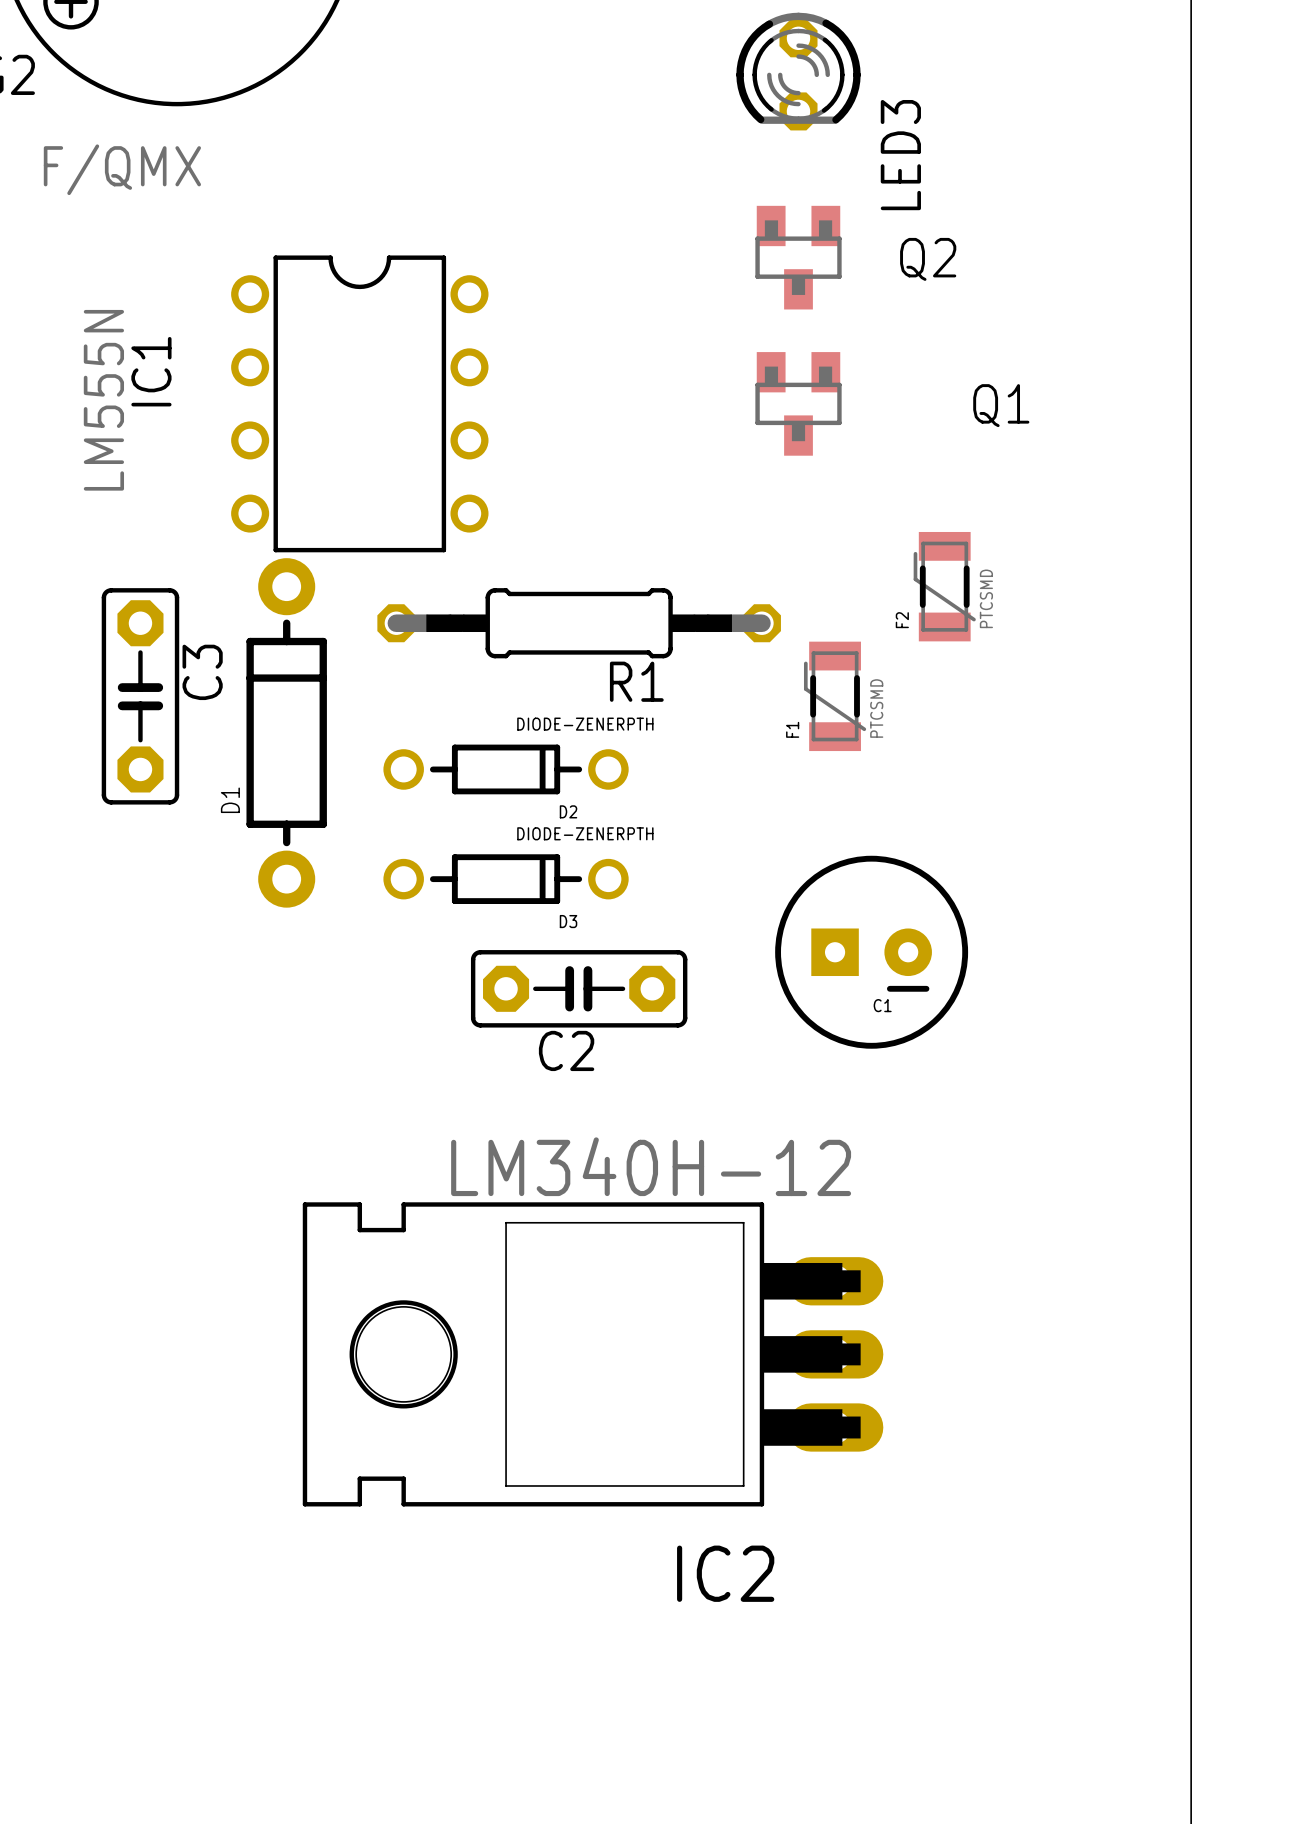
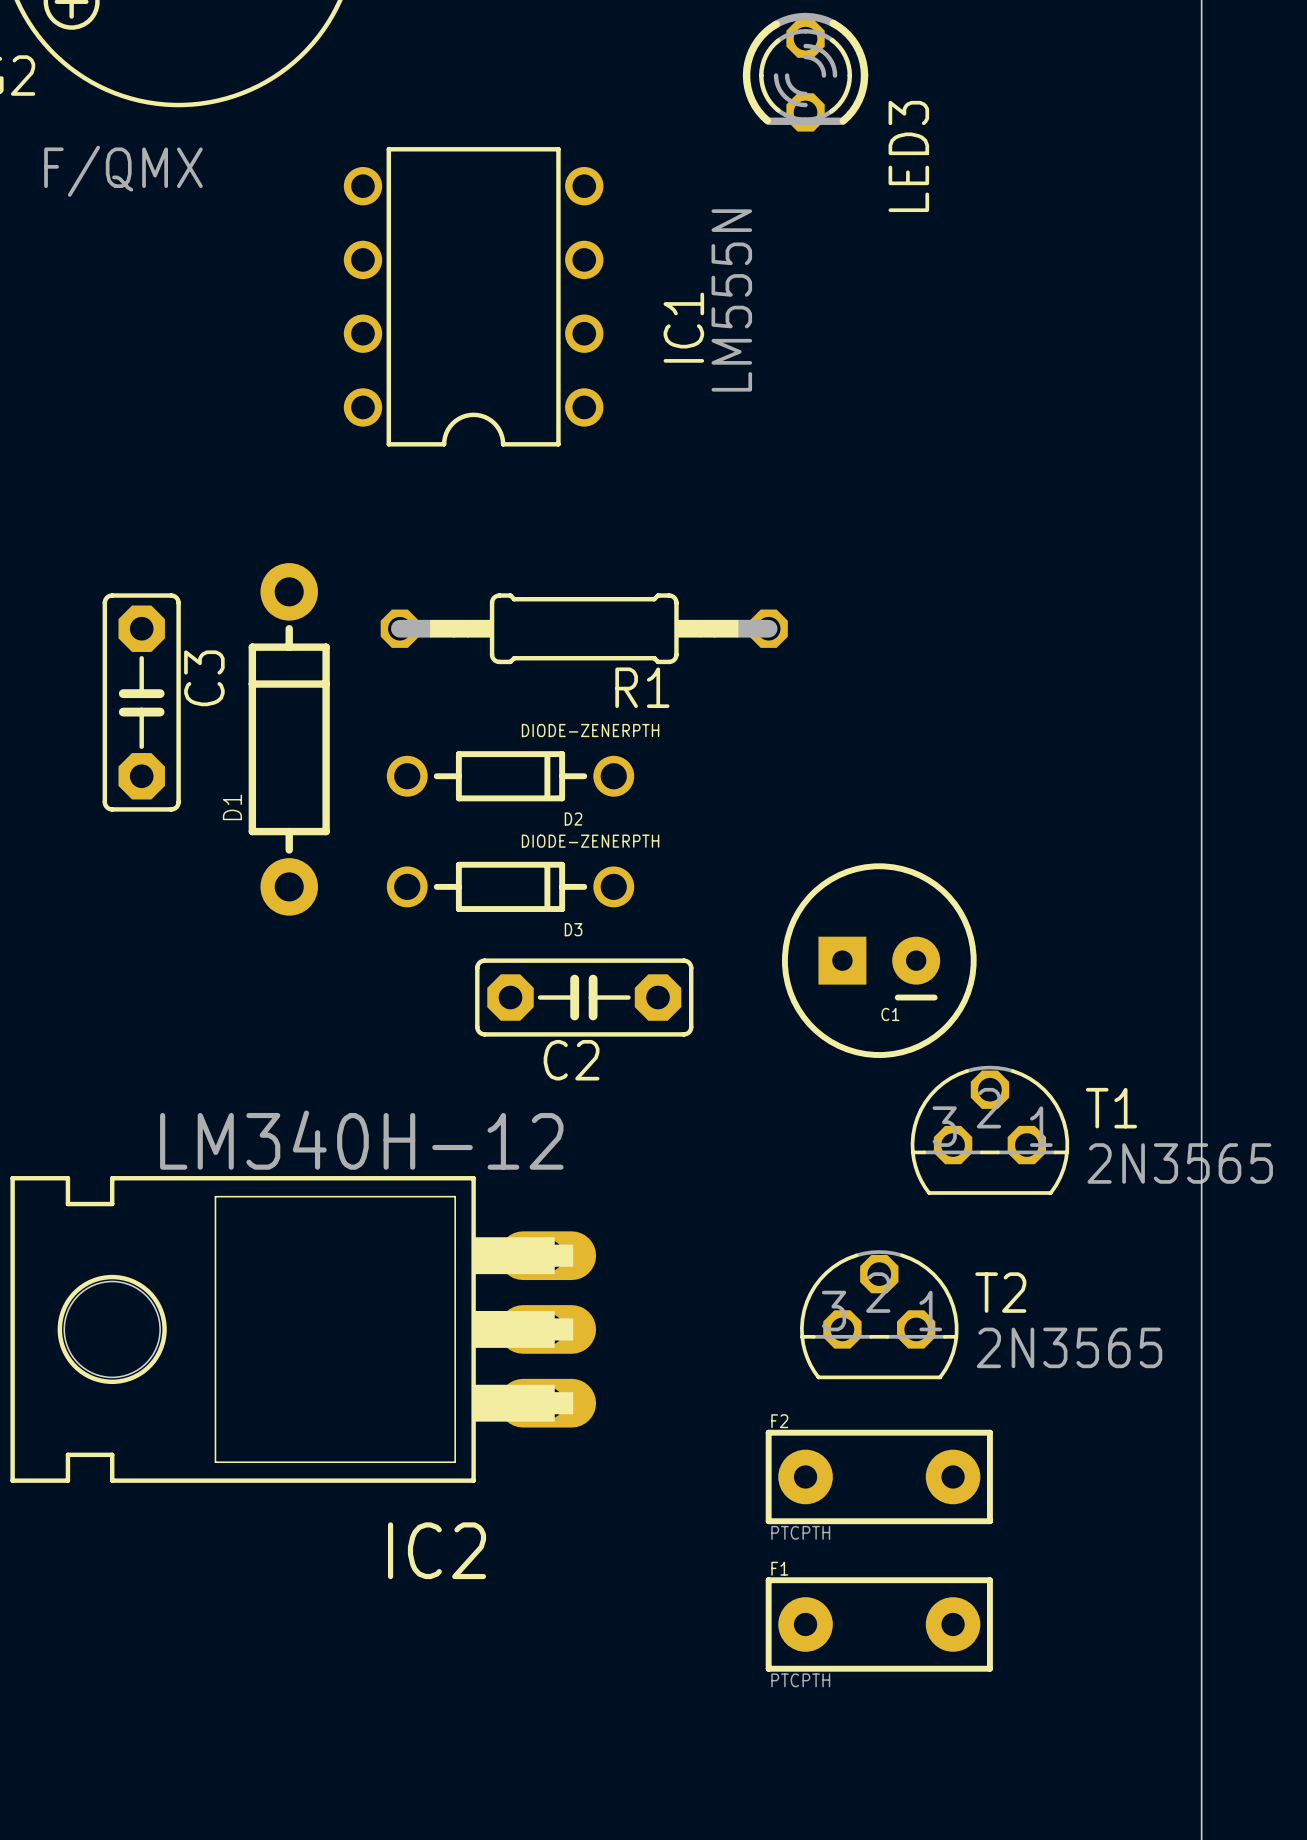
Q2: (798, 257) -> none
IC1 rotation: 0° (359, 403) -> 180° (473, 296)
Q1: (798, 403) -> none
F2 footprint: [913, 531, 976, 642] -> [765, 1429, 993, 1525]
F2 value: PTCSMD (986, 598) -> PTCPTH (800, 1532)
F2 name position: F2 (902, 620) -> F2 (779, 1421)
F1 footprint: [803, 641, 867, 752] -> [765, 1577, 993, 1672]
F1 value: PTCSMD (876, 708) -> PTCPTH (800, 1680)
F1 name position: F1 (792, 729) -> F1 (779, 1568)
T1: none -> 2N3565 (989, 1130)
T2: none -> 2N3565 (879, 1314)
IC2 position: (593, 1354) -> (303, 1329)

